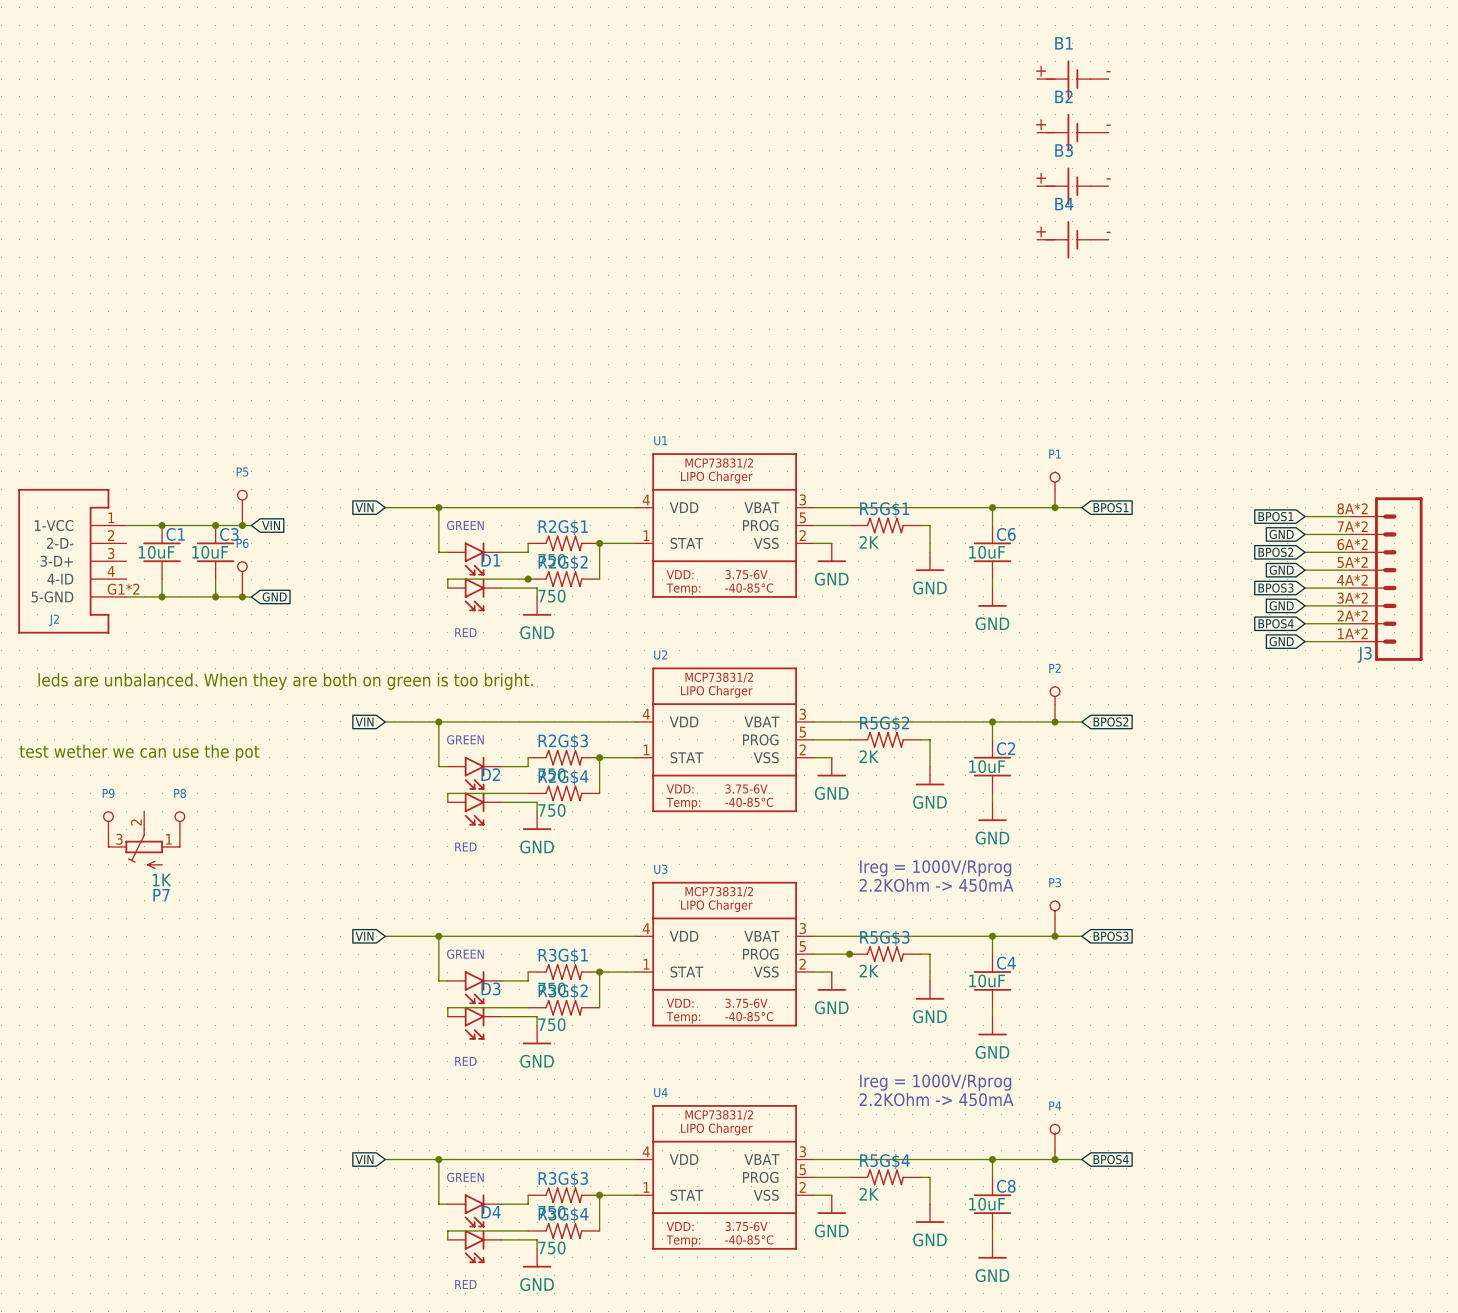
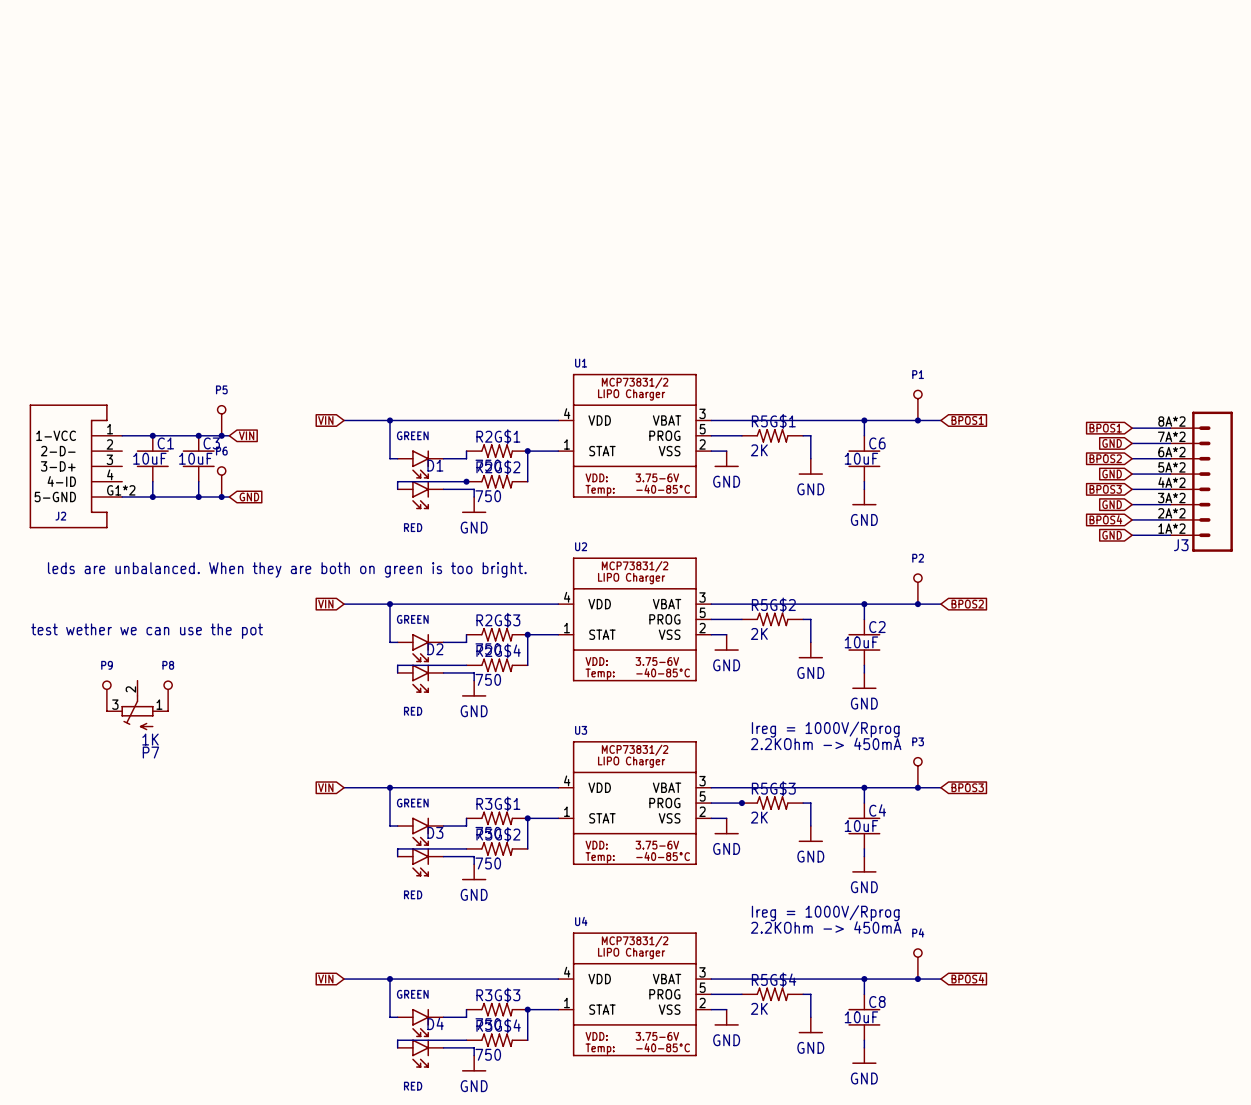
B1: (1072, 79) -> none
B2: (1072, 132) -> none
B3: (1072, 186) -> none
B4: (1072, 239) -> none

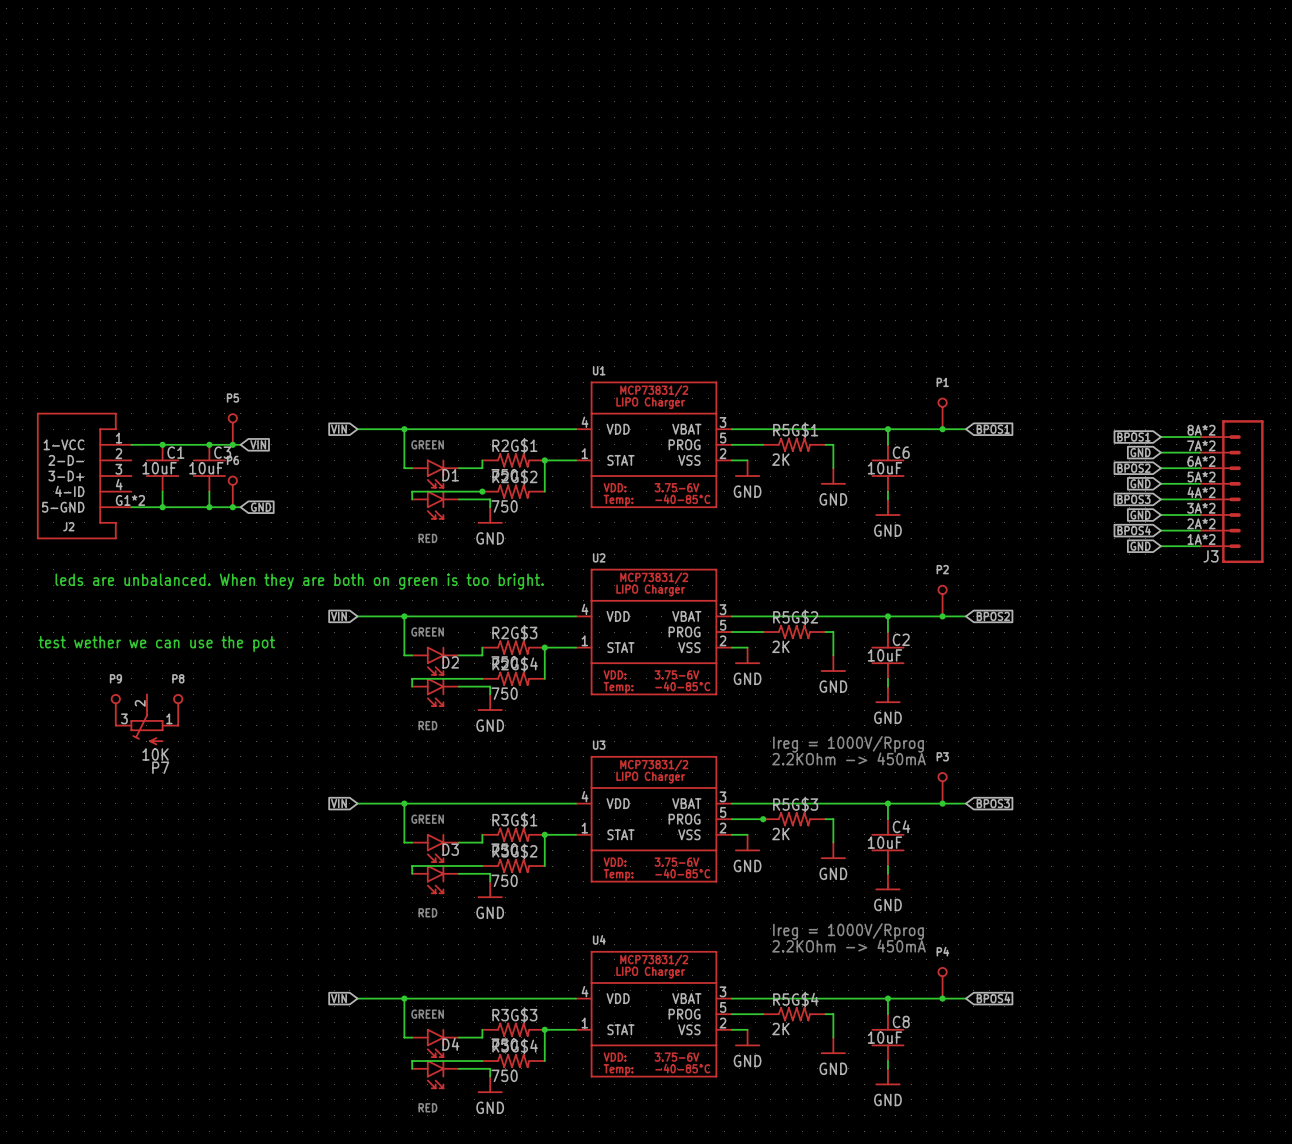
P7 value: 1K (150, 739) -> 10K (155, 754)

